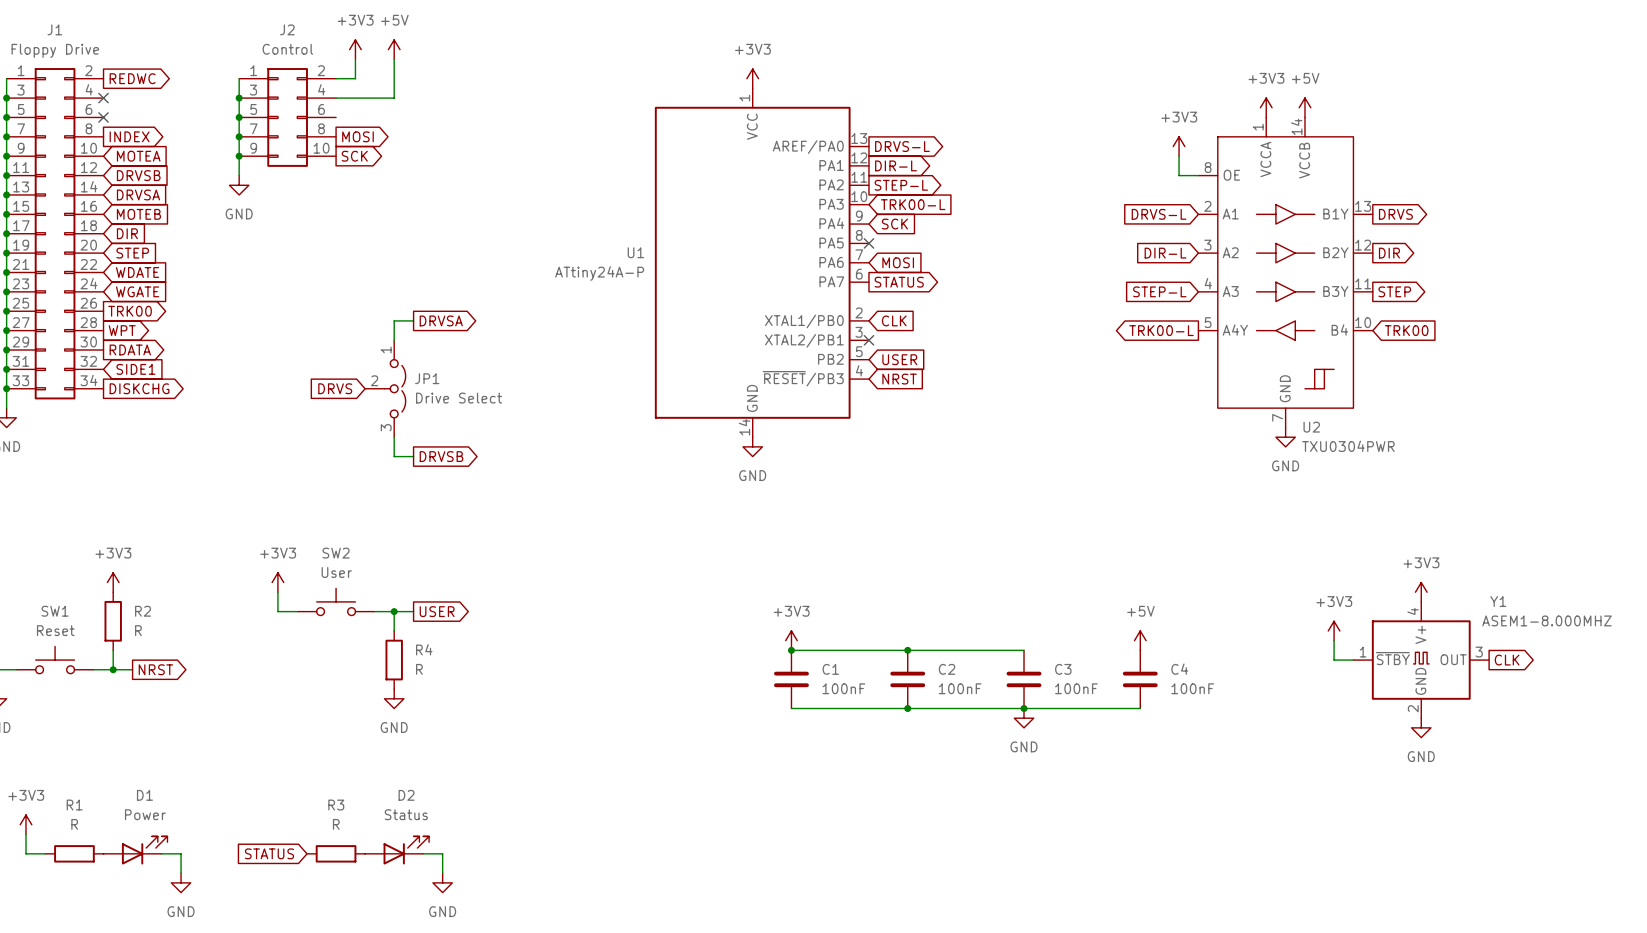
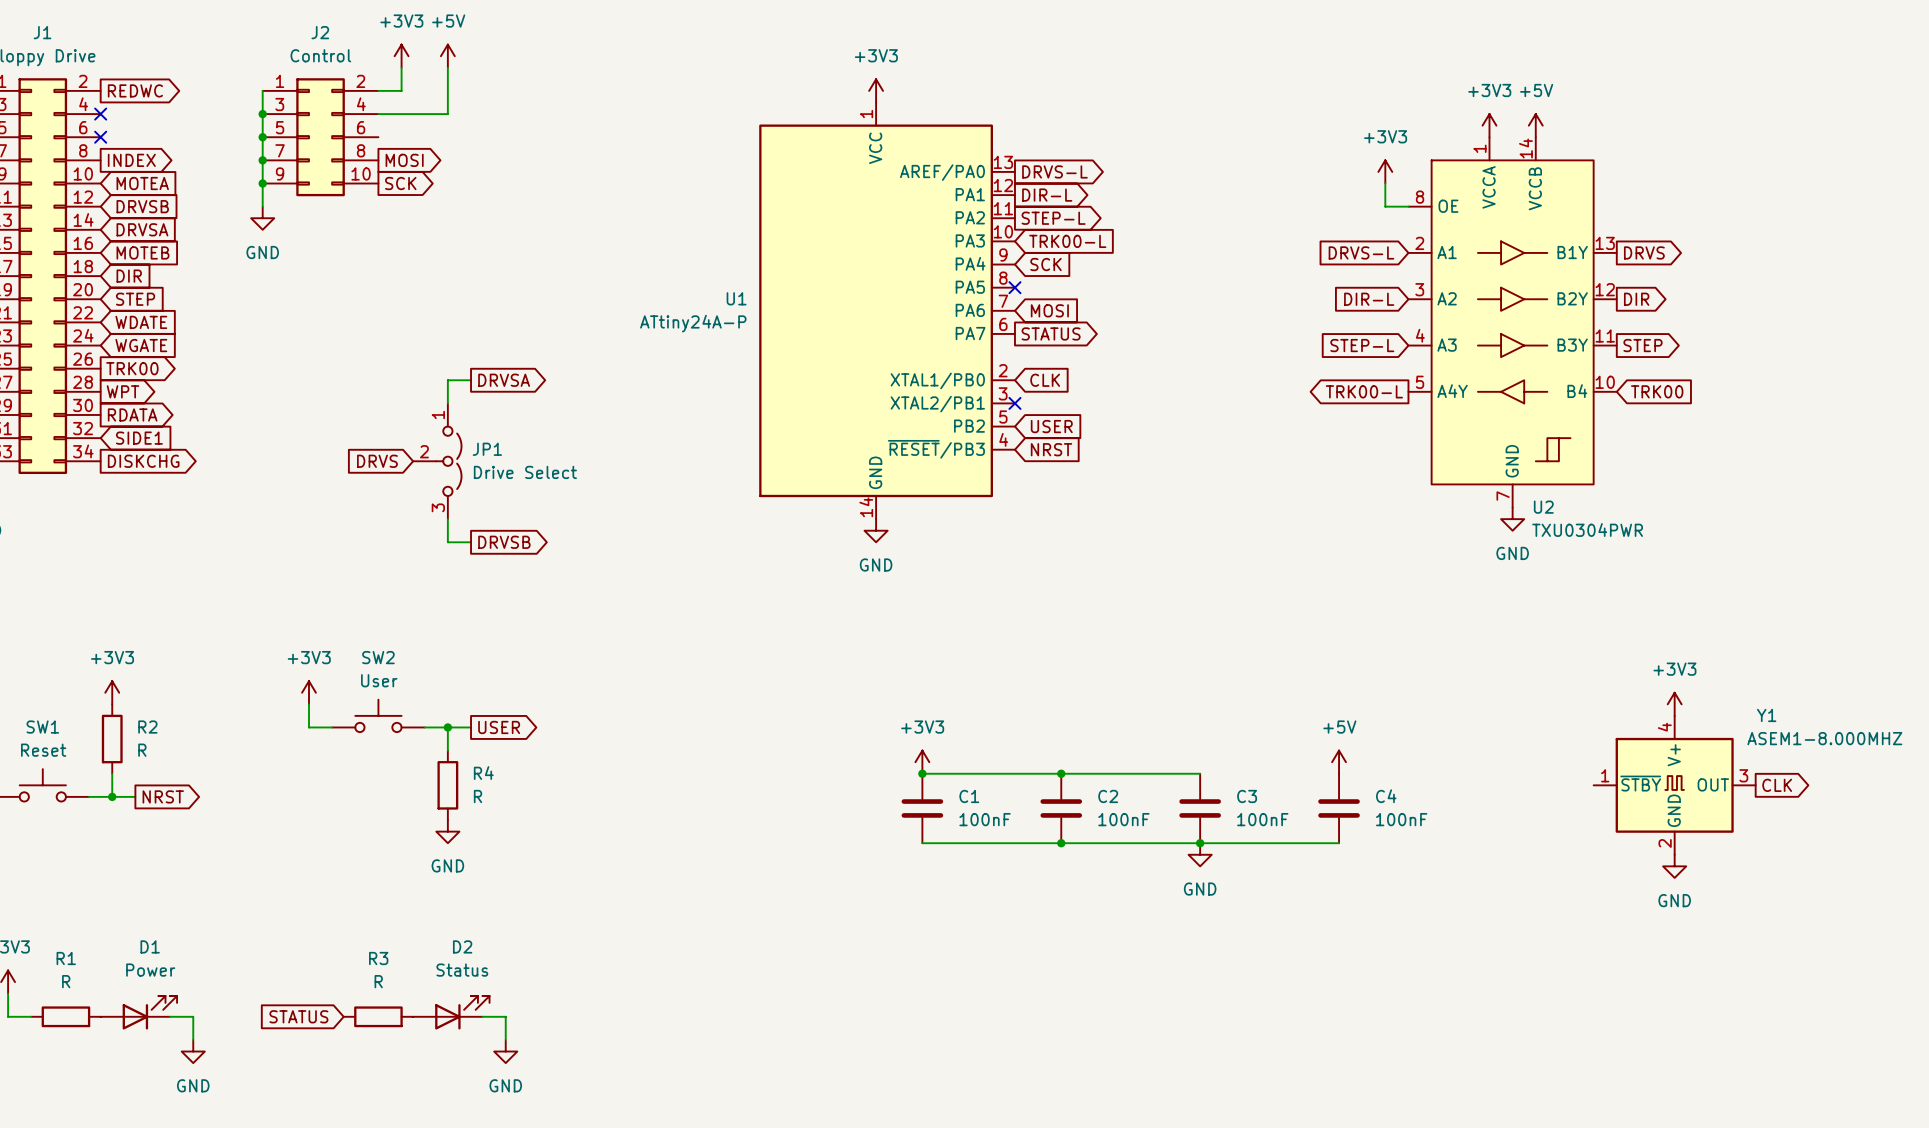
power symbol: +3V3 (1334, 630) -> none
wire: (1334, 640) (1334, 660) (1353, 660) -> none

